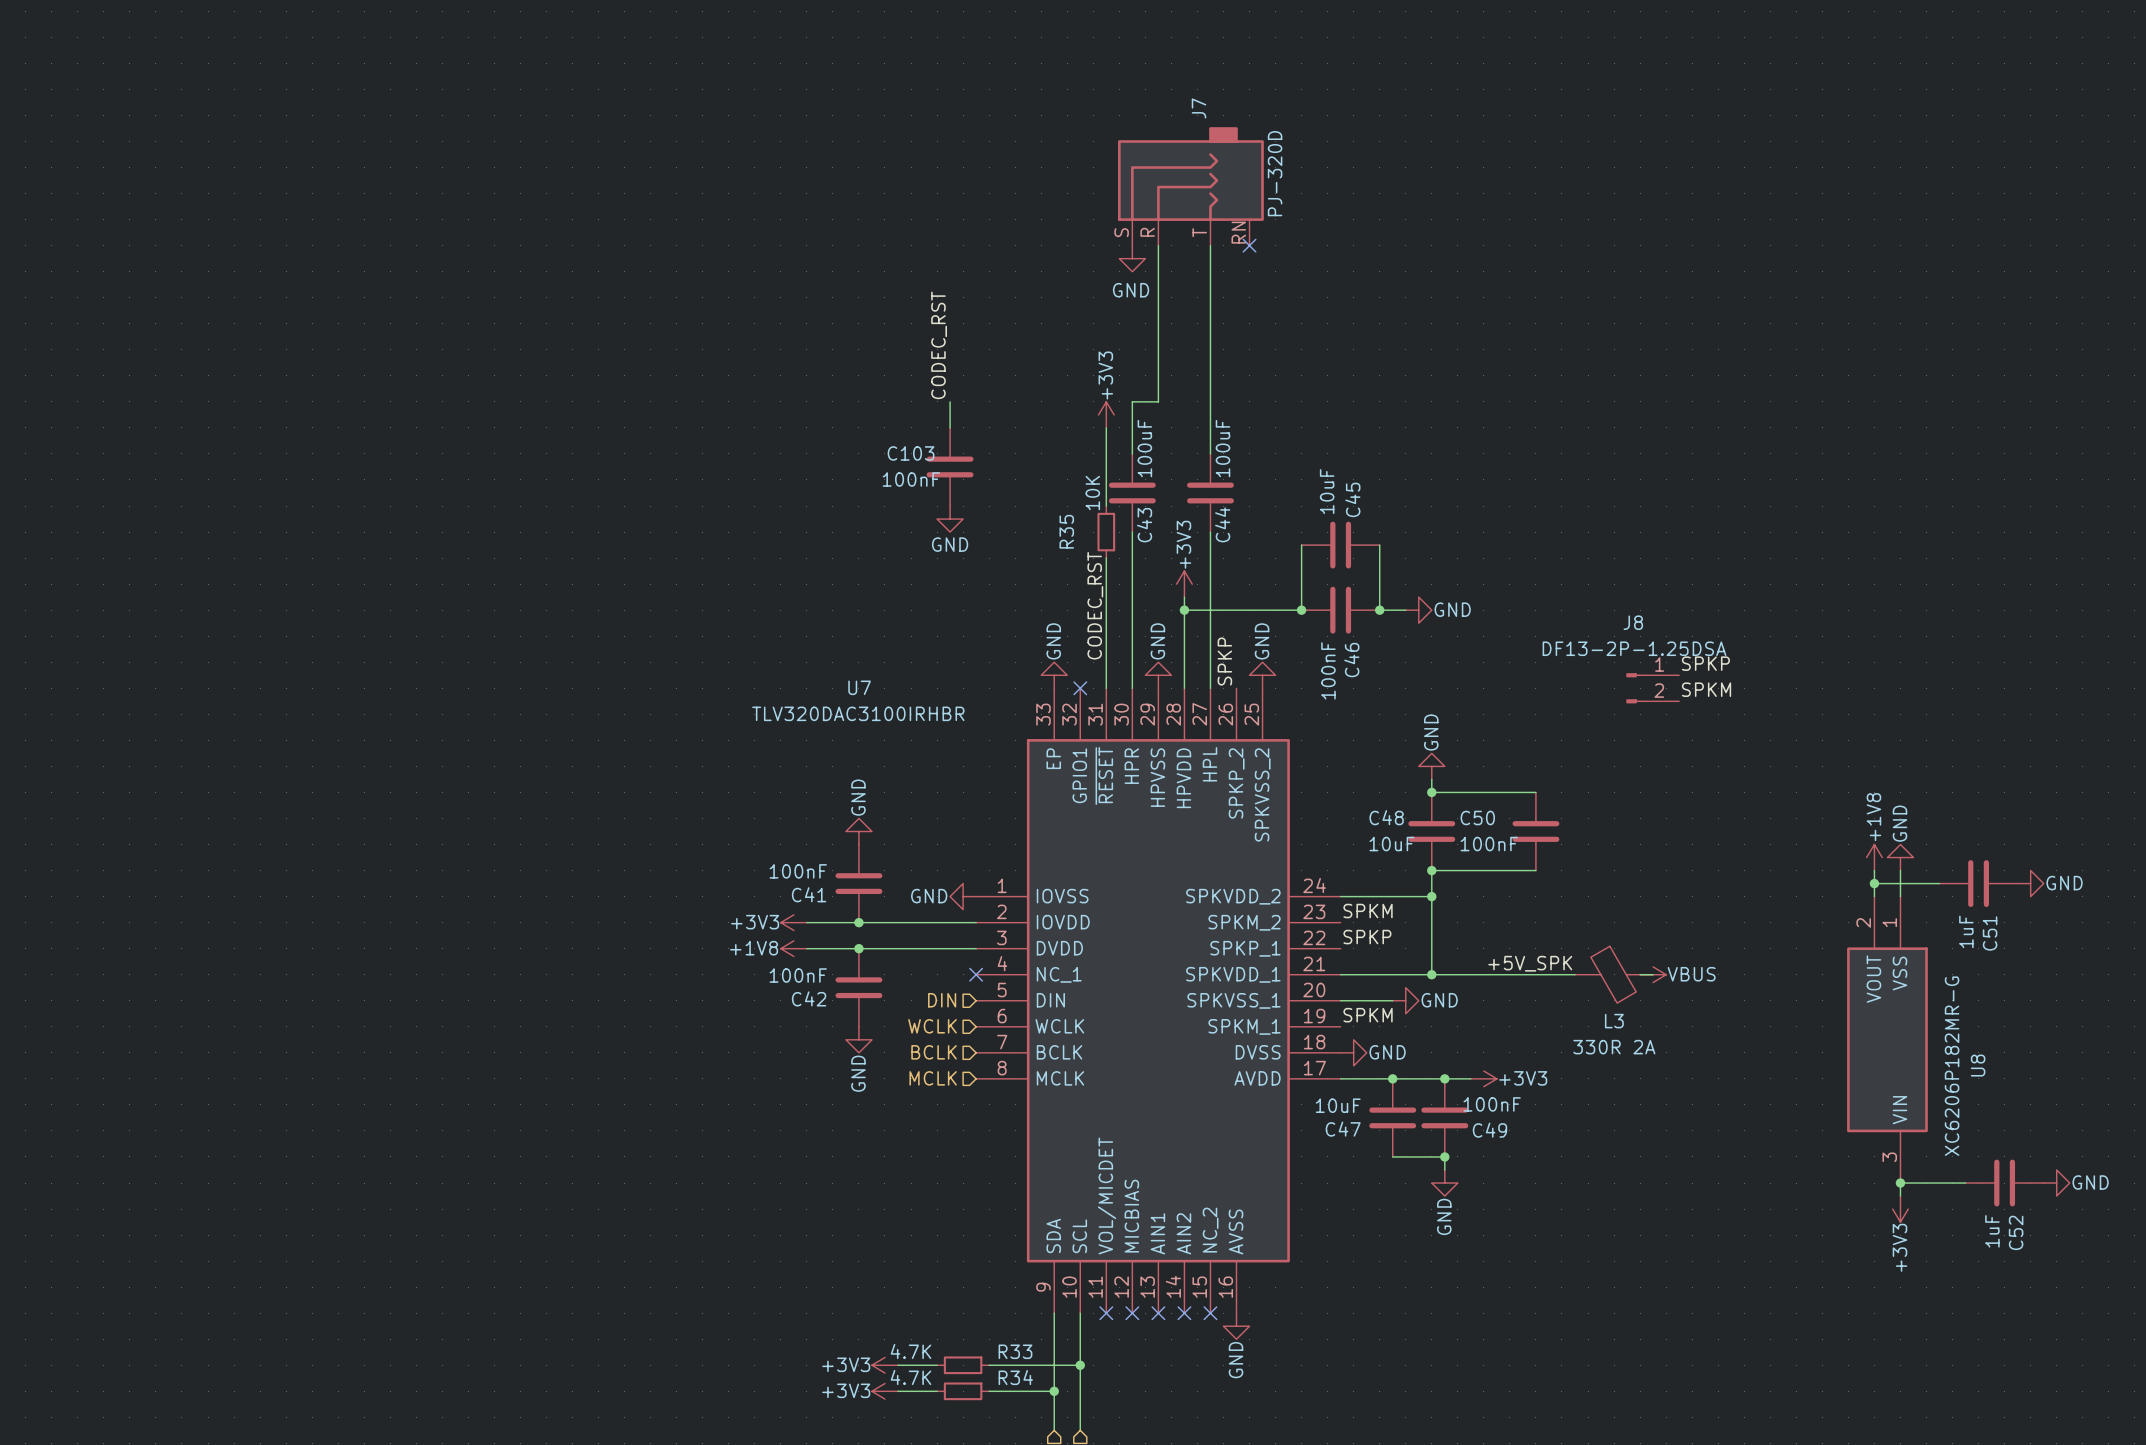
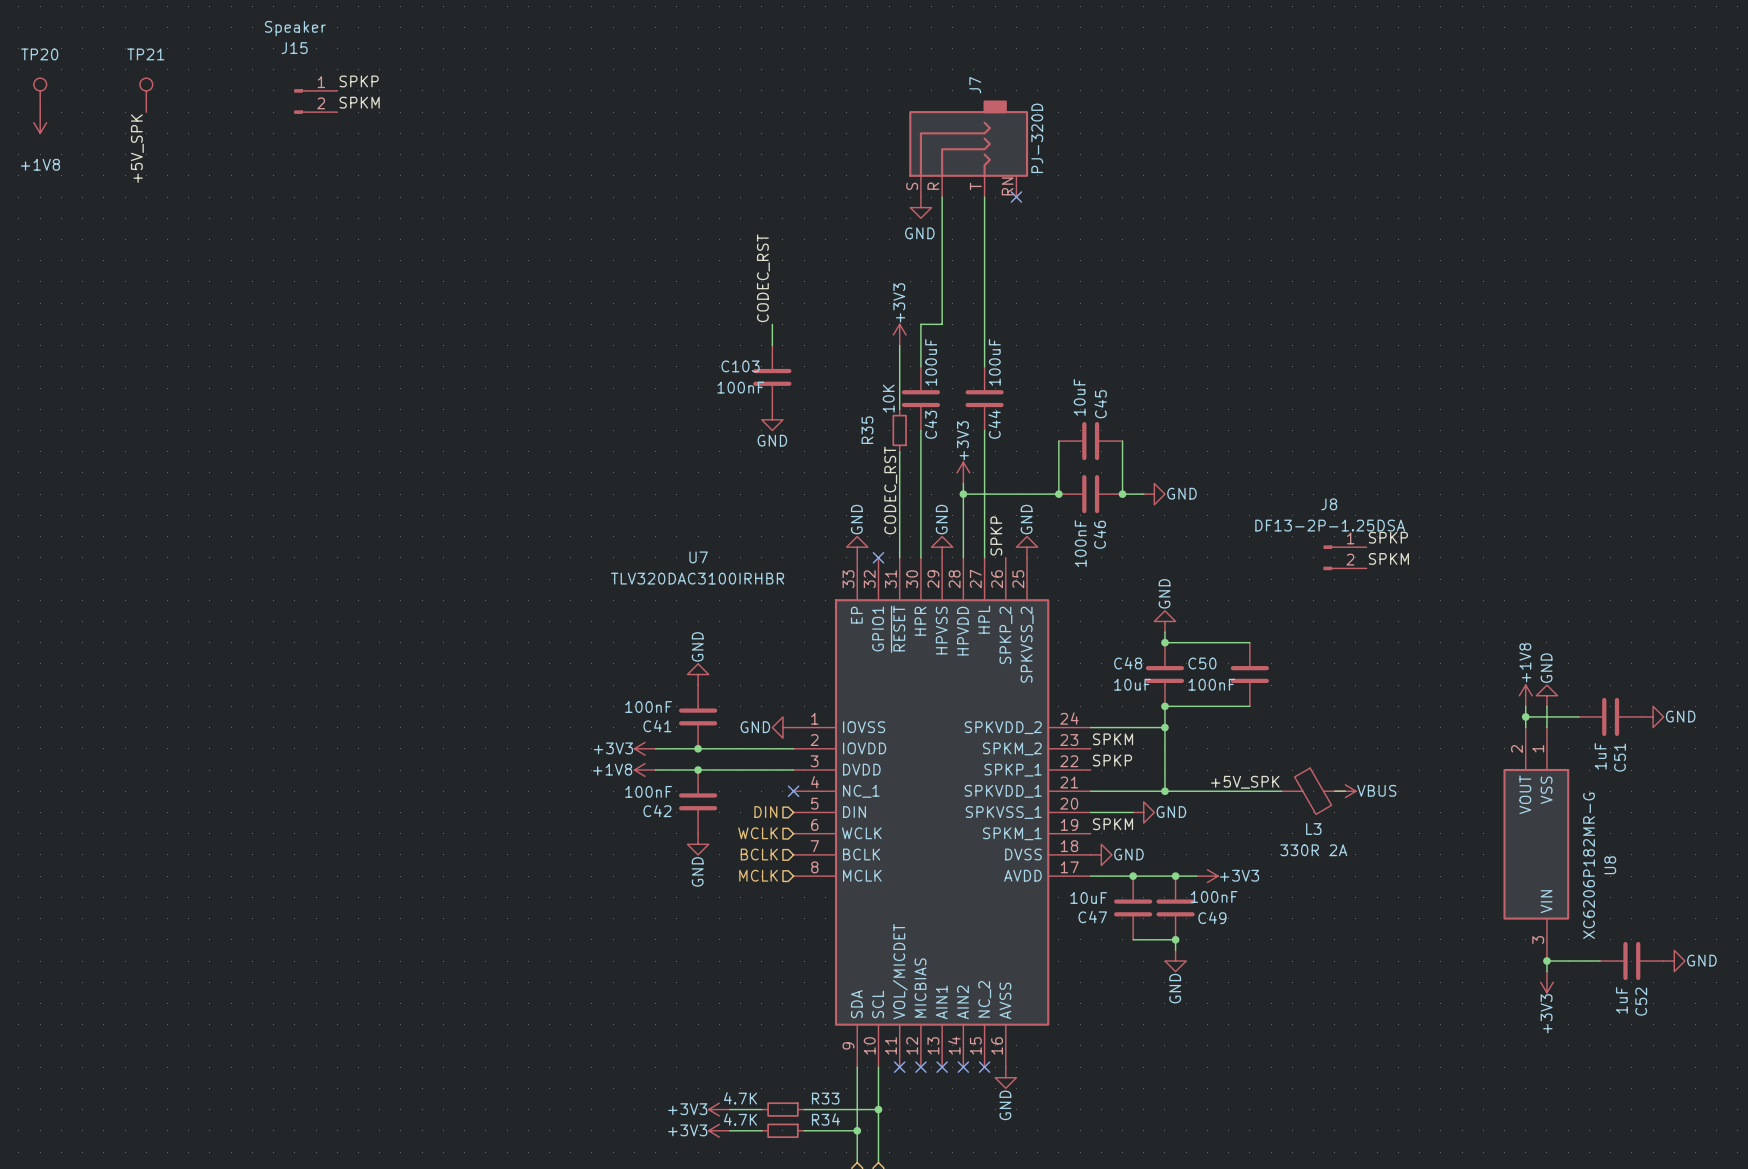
label: none -> SPKP (359, 81)
TP20: none -> (40, 95)
TP21: none -> (146, 95)
J15: none -> Speaker (315, 101)
label: none -> SPKM (359, 102)
power symbol: none -> +1V8 (40, 122)
label: none -> +5V_SPK (137, 148)

